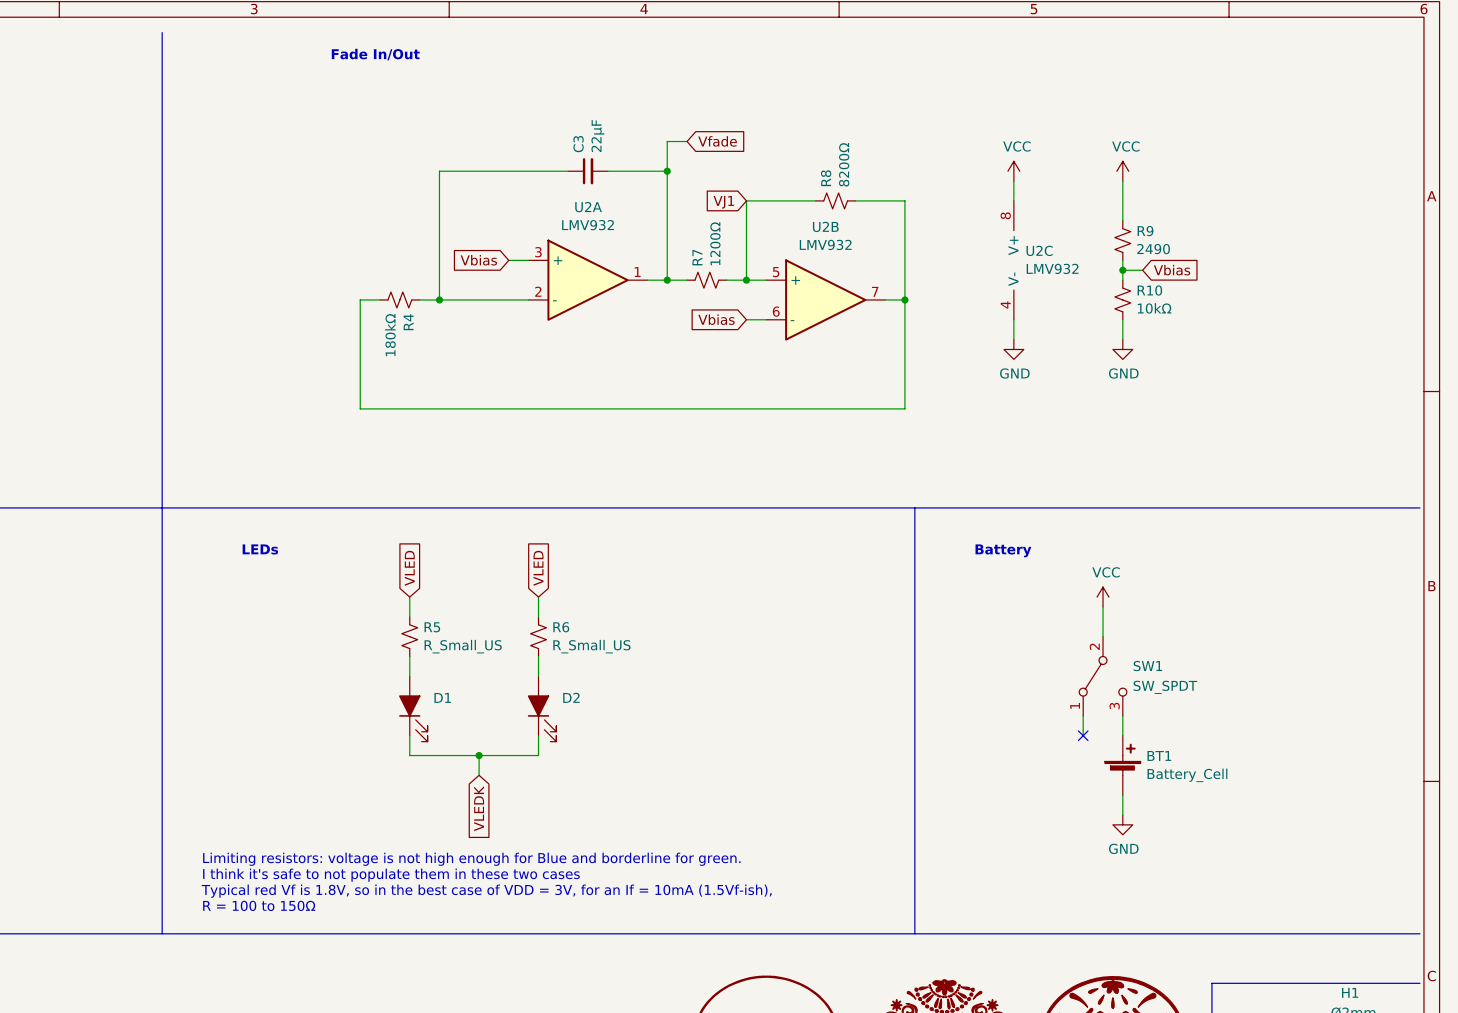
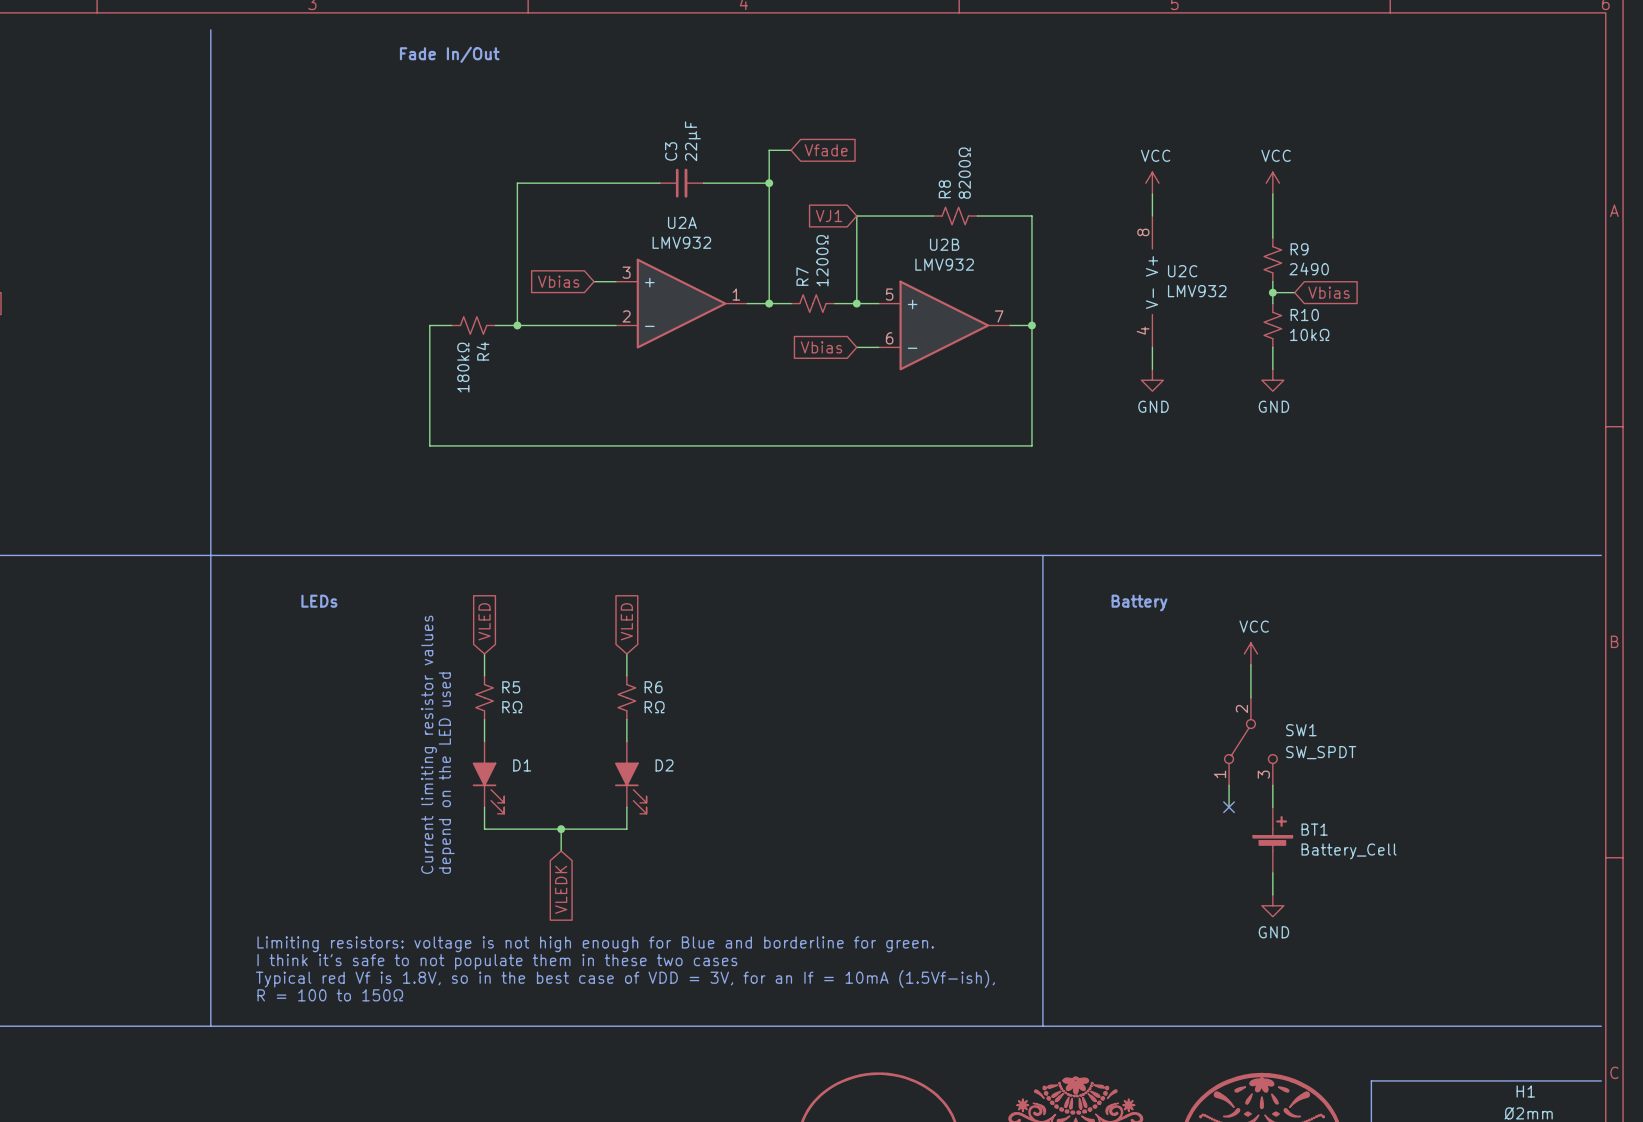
R5 value: R_Small_US (463, 646) -> RΩ (512, 707)
R6 value: R_Small_US (591, 646) -> RΩ (654, 707)
text: none -> Current limiting resistor values (429, 744)
text: none -> depend on the LED used (446, 773)

